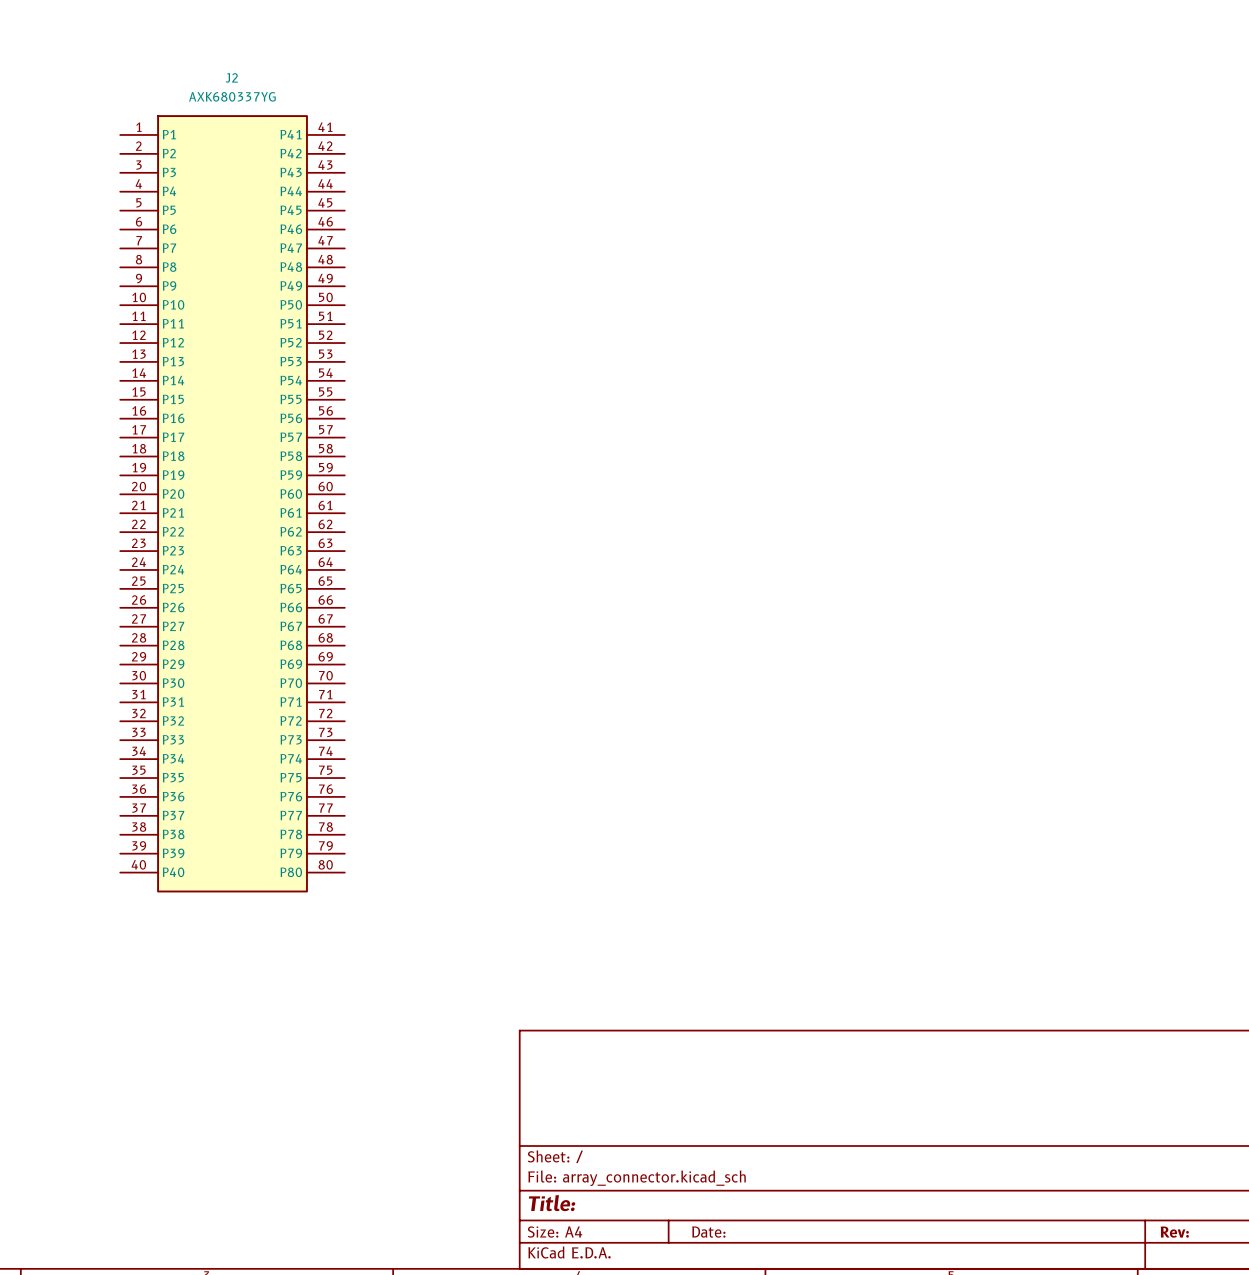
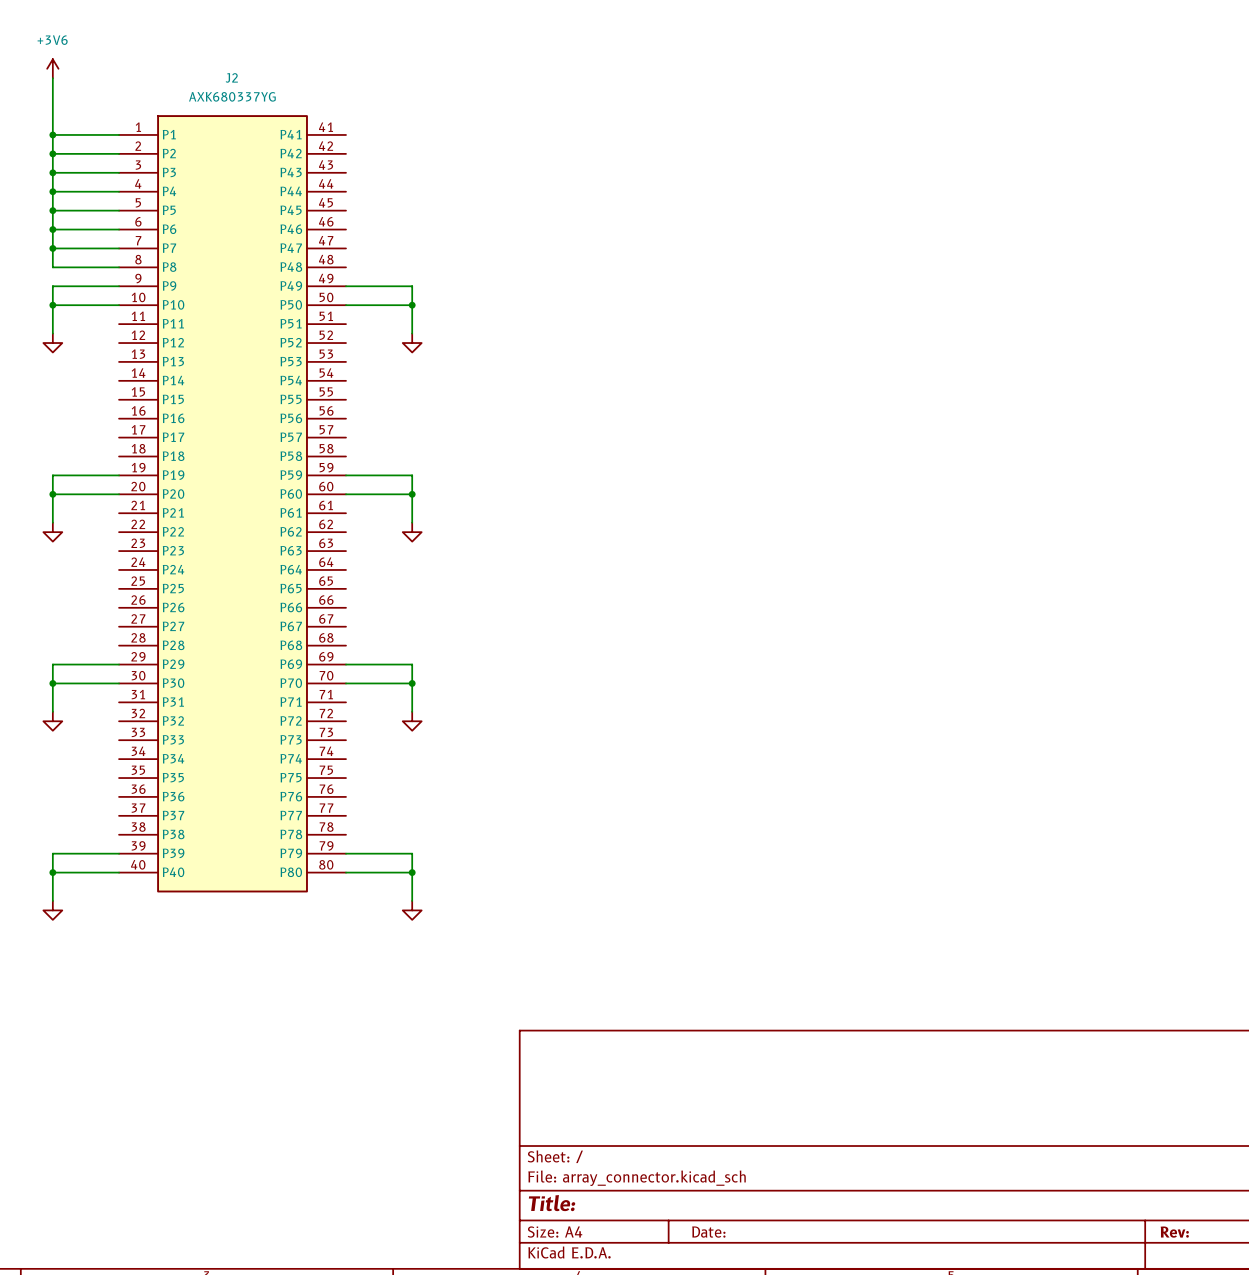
power symbol: none -> +3V6 (52, 68)
wire: none -> (52, 78) (52, 267) (119, 267)
J2 symbol: [120, 115, 345, 893] -> [119, 115, 347, 893]
wire: none -> (52, 134) (119, 134)
junction: none -> (52, 134)
wire: none -> (52, 153) (119, 153)
junction: none -> (52, 153)
wire: none -> (52, 172) (119, 172)
junction: none -> (52, 172)
wire: none -> (52, 191) (119, 191)
junction: none -> (52, 191)
wire: none -> (52, 210) (119, 210)
junction: none -> (52, 210)
wire: none -> (52, 229) (119, 229)
junction: none -> (52, 229)
wire: none -> (52, 248) (119, 248)
junction: none -> (52, 248)
wire: none -> (119, 286) (52, 286) (52, 333)
wire: none -> (346, 286) (412, 286) (412, 333)
wire: none -> (52, 305) (119, 305)
junction: none -> (52, 305)
wire: none -> (346, 305) (412, 305)
junction: none -> (412, 305)
power symbol: none -> (52, 343)
power symbol: none -> (412, 343)
wire: none -> (119, 475) (52, 475) (52, 522)
wire: none -> (346, 475) (412, 475) (412, 522)
wire: none -> (52, 494) (119, 494)
junction: none -> (52, 494)
wire: none -> (346, 494) (412, 494)
junction: none -> (412, 494)
power symbol: none -> (52, 532)
power symbol: none -> (412, 532)
wire: none -> (119, 664) (52, 664) (52, 711)
wire: none -> (346, 664) (412, 664) (412, 711)
wire: none -> (52, 683) (119, 683)
junction: none -> (52, 683)
wire: none -> (346, 683) (412, 683)
junction: none -> (412, 683)
power symbol: none -> (52, 721)
power symbol: none -> (412, 721)
wire: none -> (119, 853) (52, 853) (52, 900)
wire: none -> (346, 853) (412, 853) (412, 900)
wire: none -> (52, 872) (119, 872)
junction: none -> (52, 872)
wire: none -> (346, 872) (412, 872)
junction: none -> (412, 872)
power symbol: none -> (52, 910)
power symbol: none -> (412, 910)

